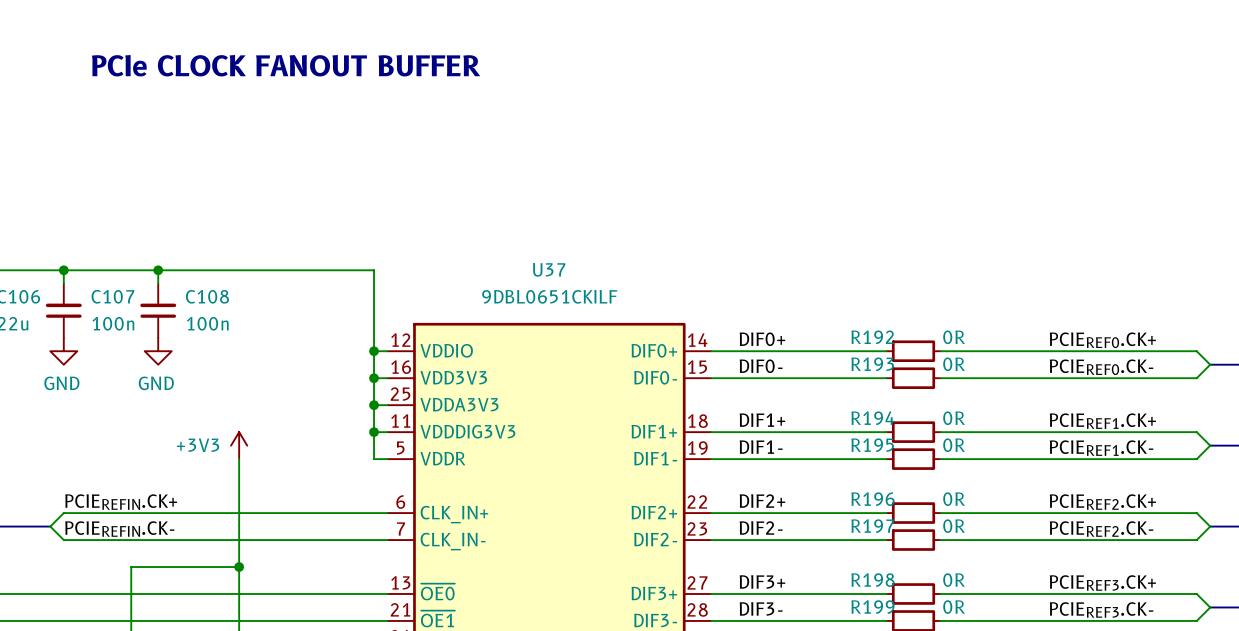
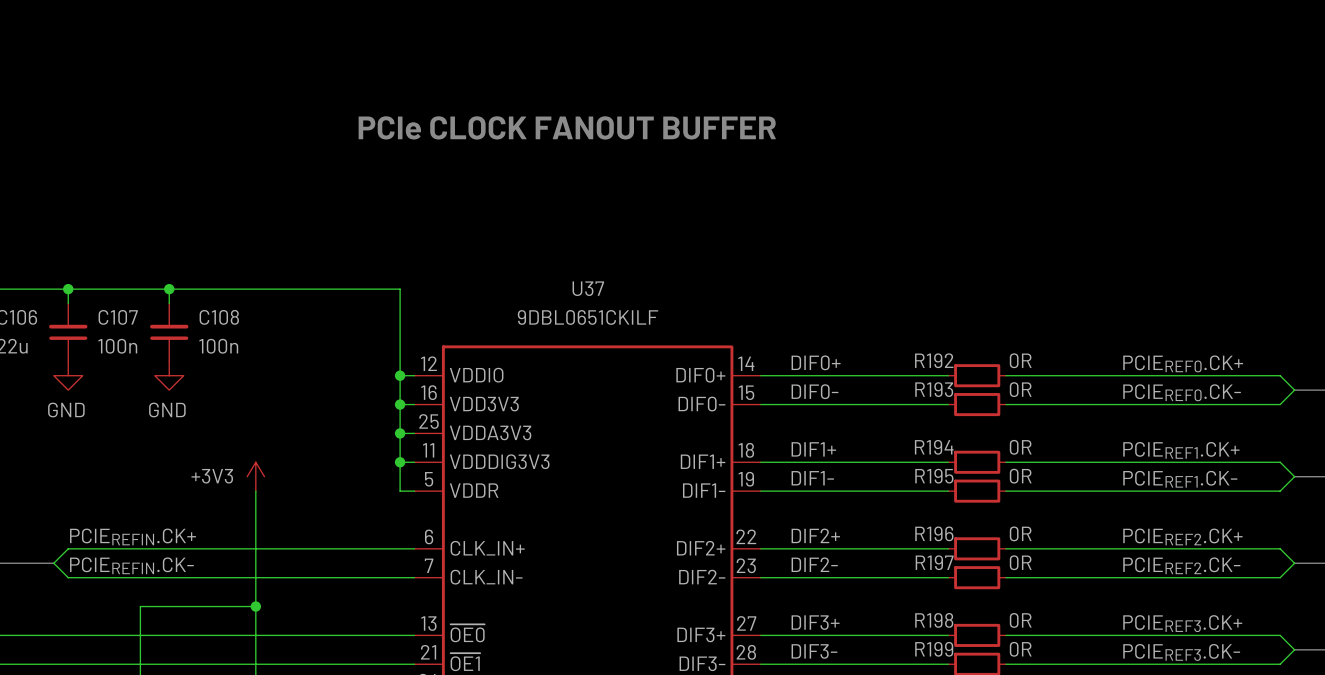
text position: PCIe CLOCK FANOUT BUFFER (286, 65) -> PCIe CLOCK FANOUT BUFFER (567, 127)

